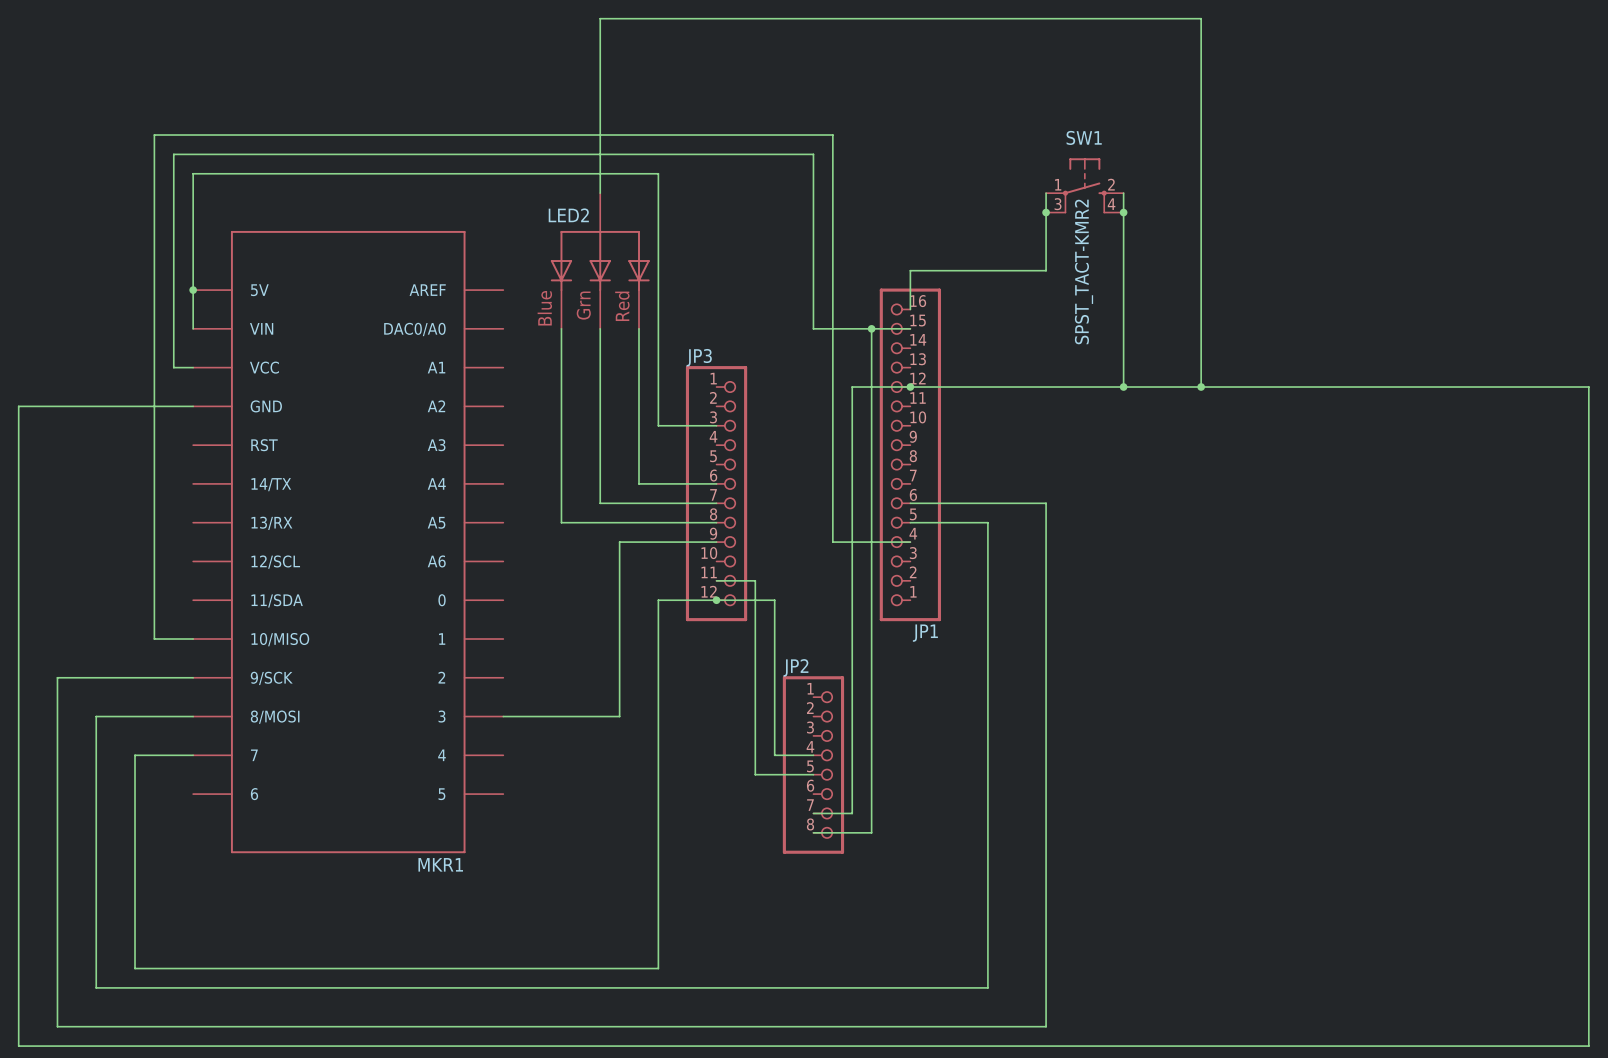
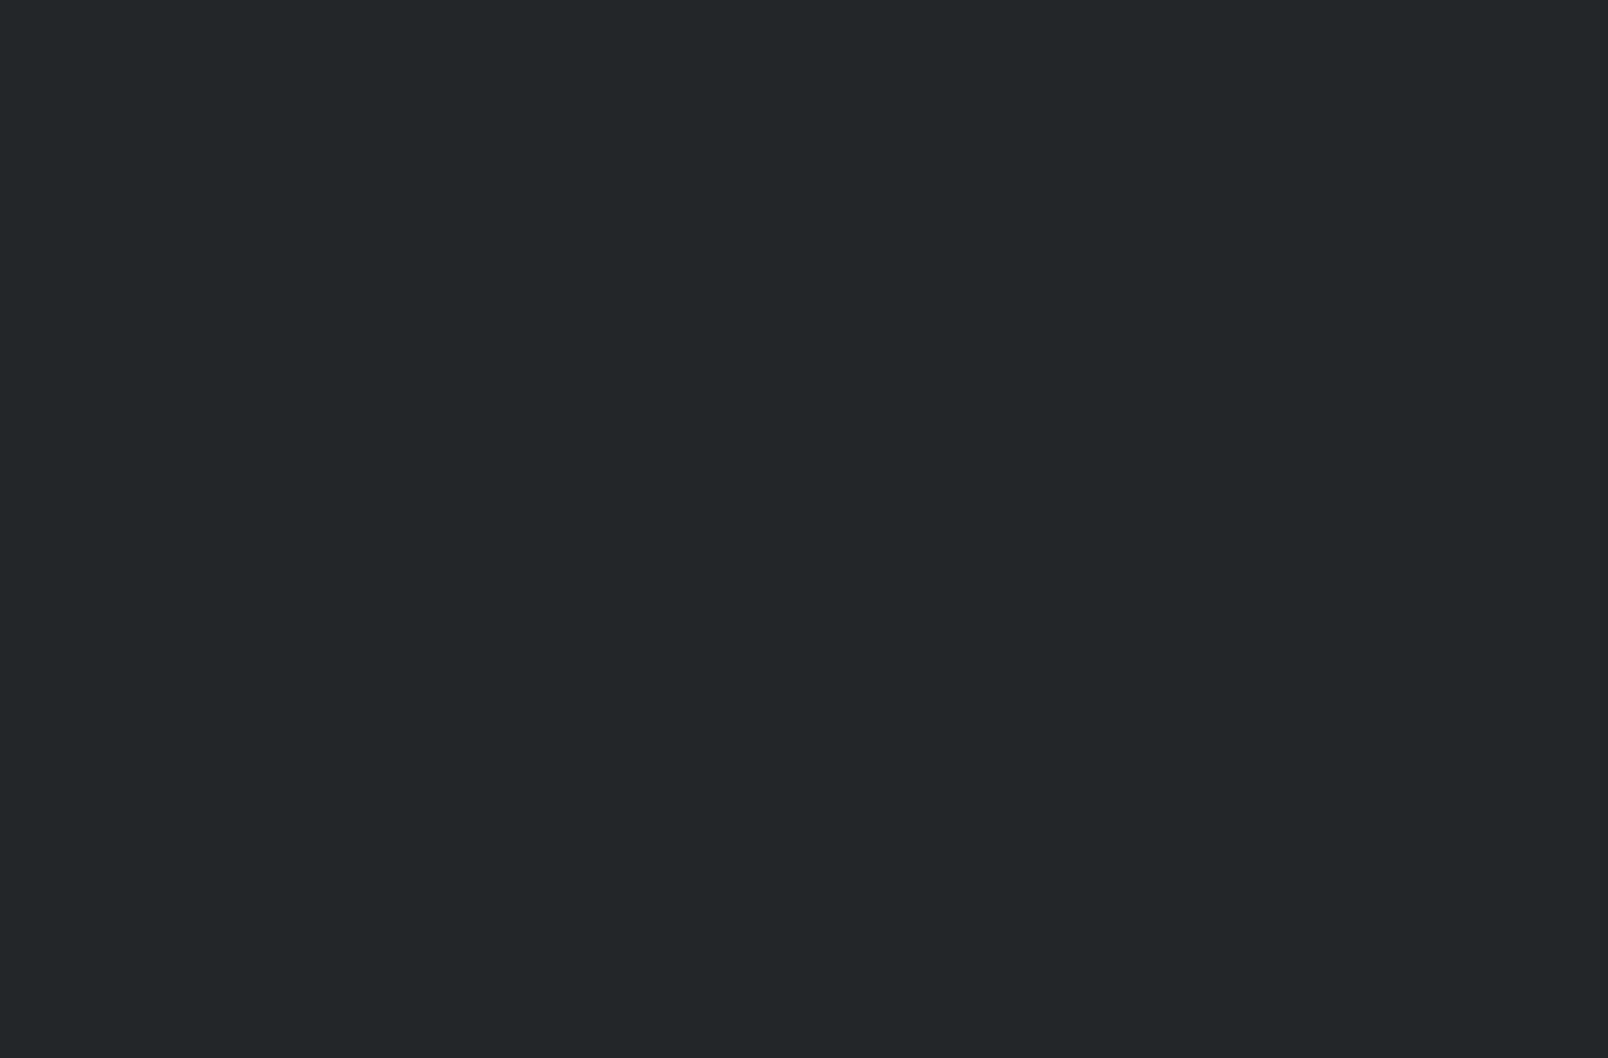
SW1: SPST_TACT-KMR2 (1084, 185) -> none
wire: (600, 193) (600, 18) (1201, 18) (1201, 387) -> none
wire: (1046, 193) (1046, 270) (910, 270) (910, 309) -> none
wire: (1123, 193) (1123, 387) -> none
junction: (1046, 212) -> none
junction: (1123, 212) -> none
LED2: (600, 261) -> none
junction: (193, 290) -> none
wire: (193, 328) (193, 173) (658, 173) (658, 425) (716, 425) -> none
wire: (561, 328) (561, 522) (716, 522) -> none
wire: (600, 328) (600, 503) (716, 503) -> none
wire: (639, 328) (639, 483) (716, 483) -> none
wire: (871, 328) (871, 832) (813, 832) -> none
junction: (871, 328) -> none
wire: (910, 328) (813, 328) (813, 154) (173, 154) (173, 367) (193, 367) -> none
junction: (910, 387) -> none
junction: (1123, 387) -> none
junction: (1201, 387) -> none
wire: (193, 406) (18, 406) (18, 1046) (1588, 1046) (1588, 387) (852, 387) (852, 813) (813, 813) -> none
JP1: (910, 454) -> none
JP3: (716, 493) -> none
wire: (910, 503) (1046, 503) (1046, 1026) (57, 1026) (57, 677) (193, 677) -> none
wire: (910, 522) (987, 522) (987, 987) (96, 987) (96, 716) (193, 716) -> none
MKR1: (348, 542) -> none
wire: (716, 542) (619, 542) (619, 716) (503, 716) -> none
wire: (910, 542) (832, 542) (832, 135) (154, 135) (154, 639) (193, 639) -> none
wire: (716, 580) (755, 580) (755, 774) (813, 774) -> none
junction: (716, 600) -> none
wire: (193, 755) (135, 755) (135, 968) (658, 968) (658, 600) (774, 600) (774, 755) (813, 755) -> none
JP2: (813, 765) -> none

